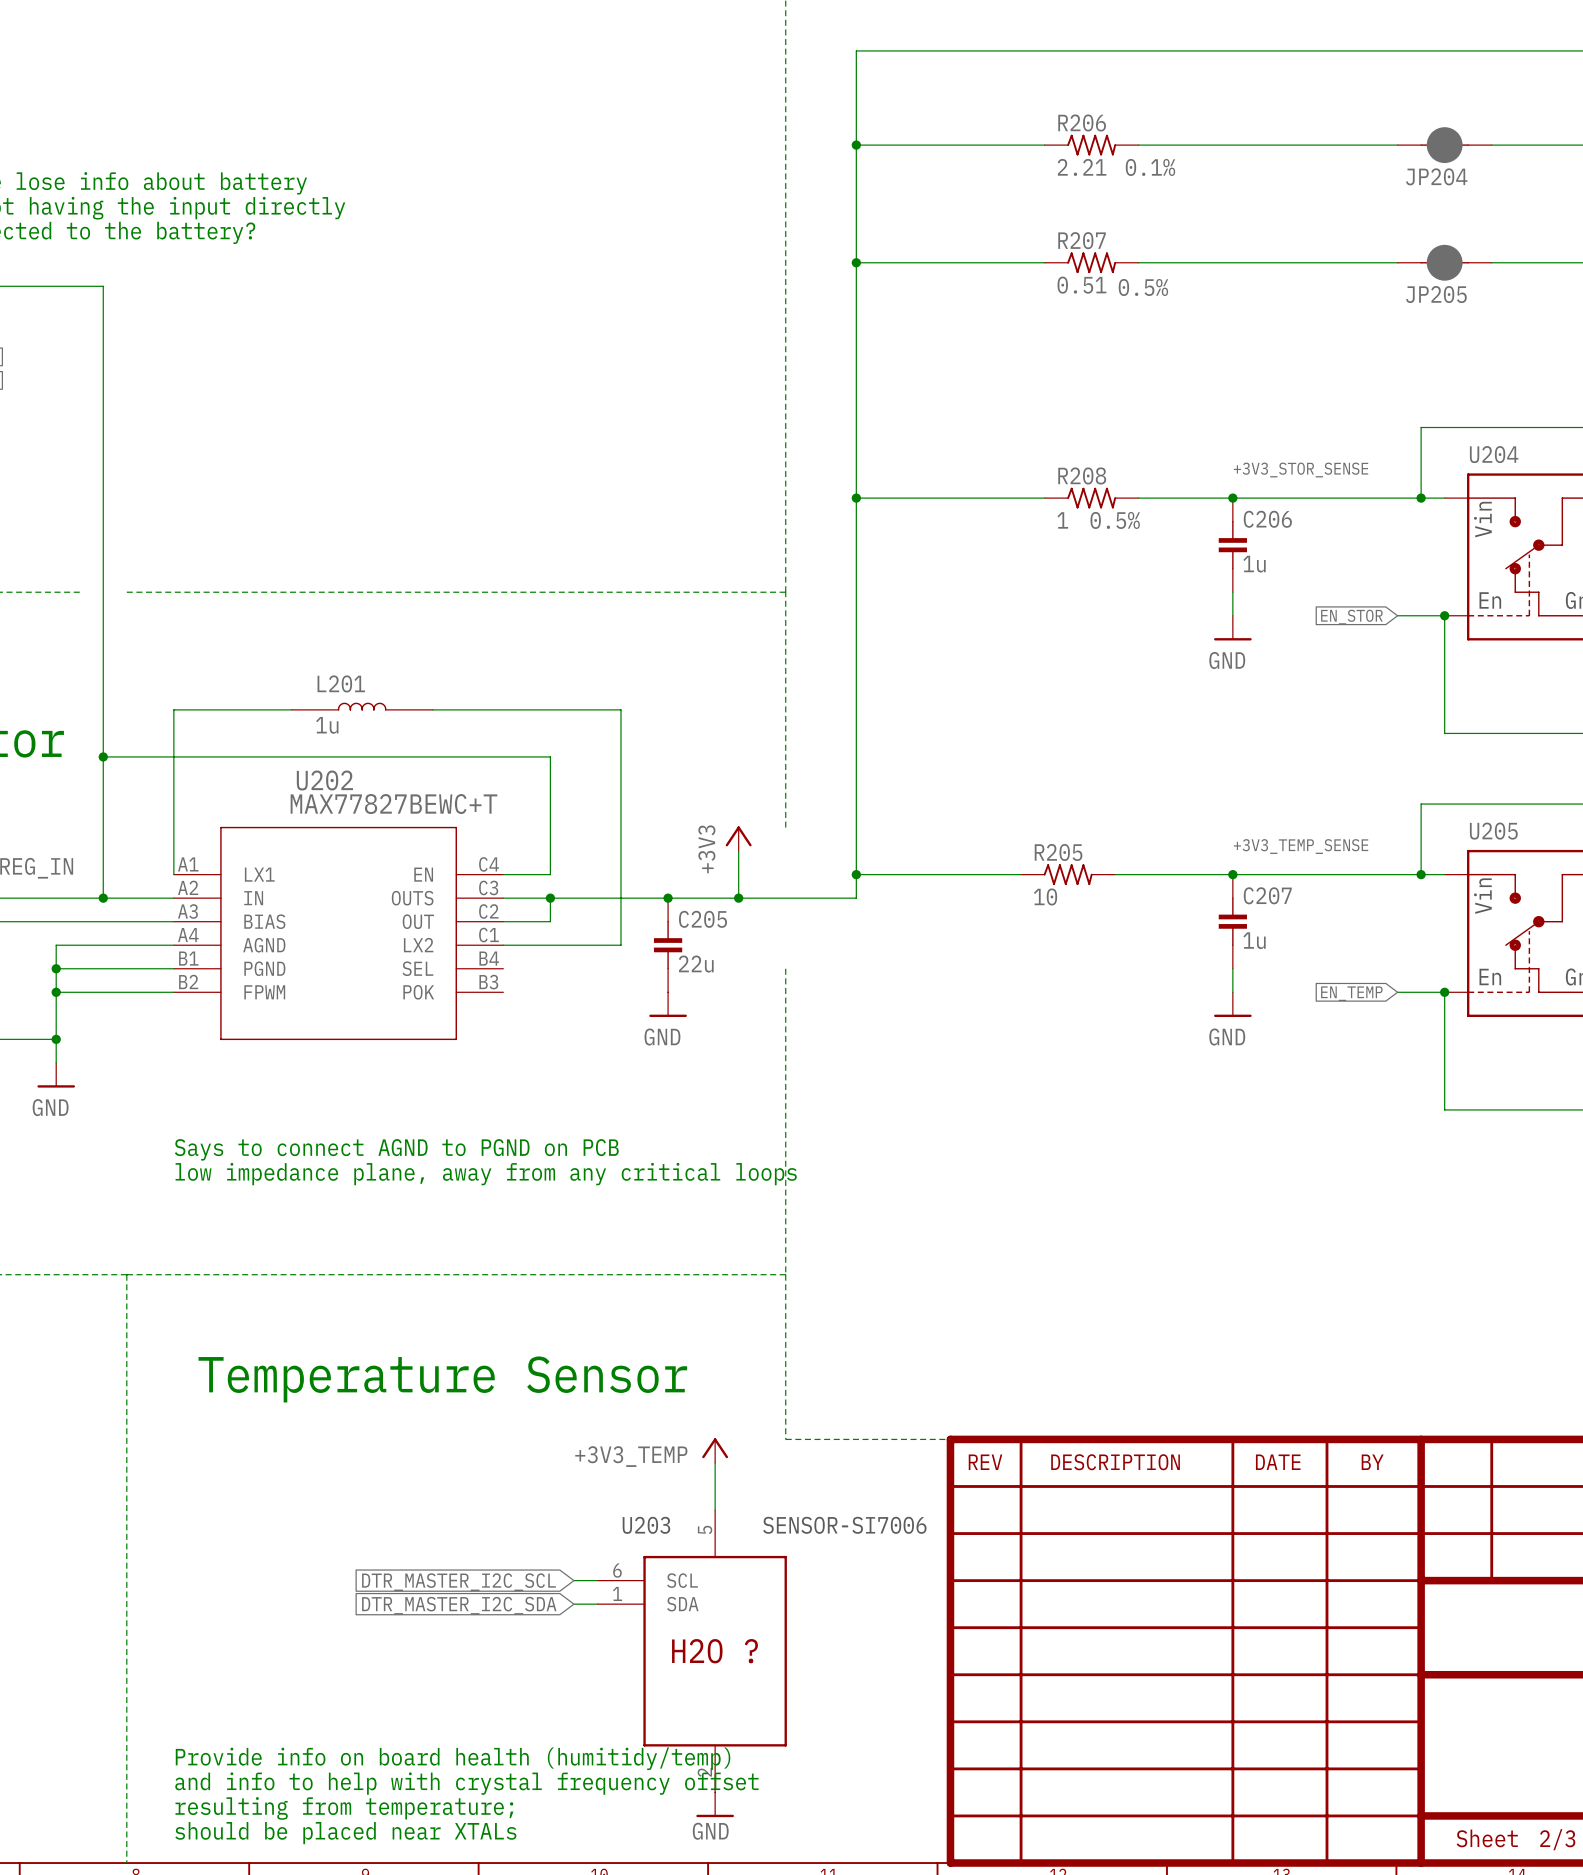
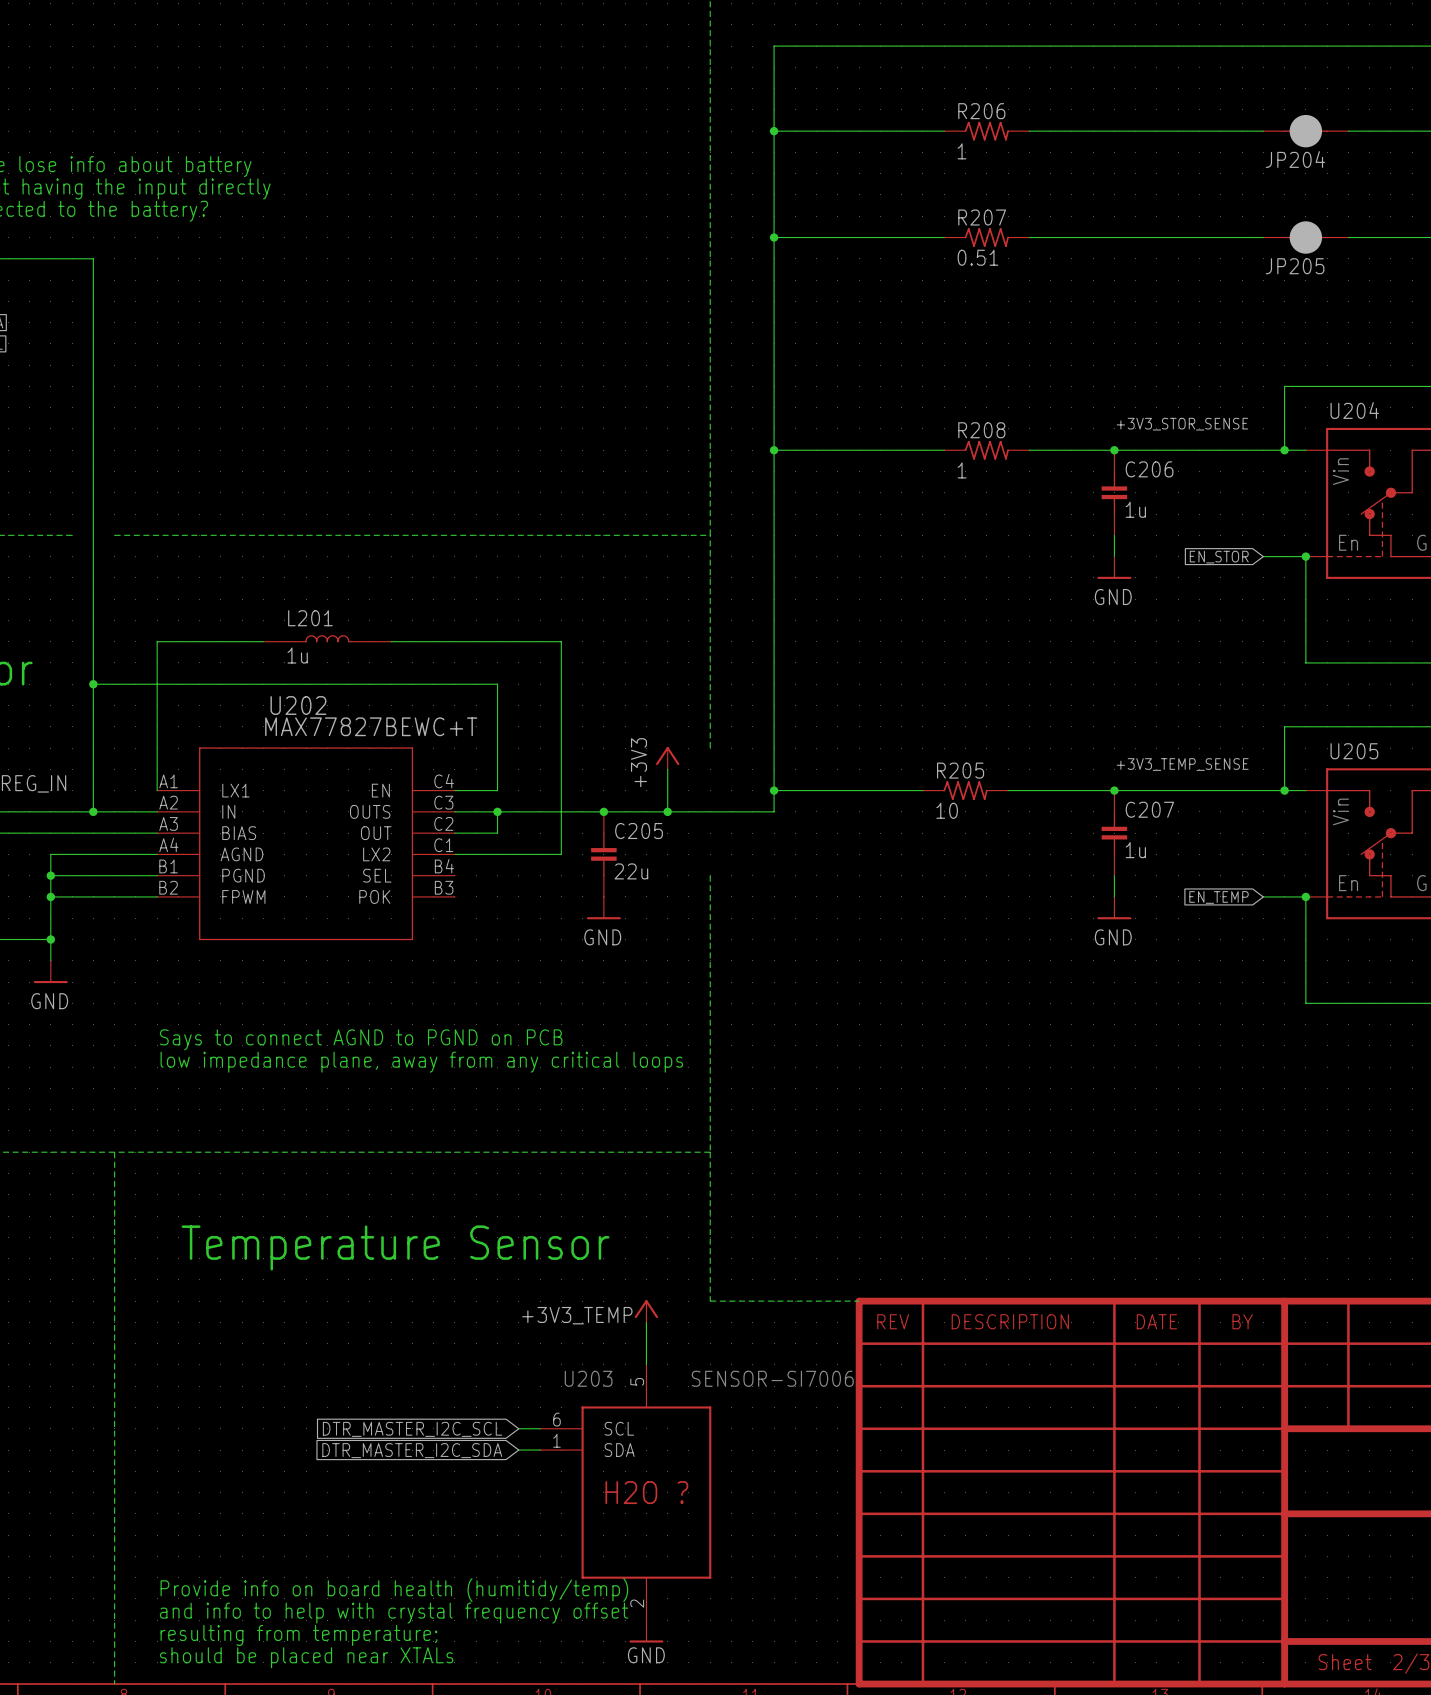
R206 value: 2.21 (1082, 167) -> 1 (962, 151)
R206 text: 0.1% (1150, 167) -> none
R207 text: 0.5% (1143, 287) -> none
R208 text: 0.5% (1115, 520) -> none

